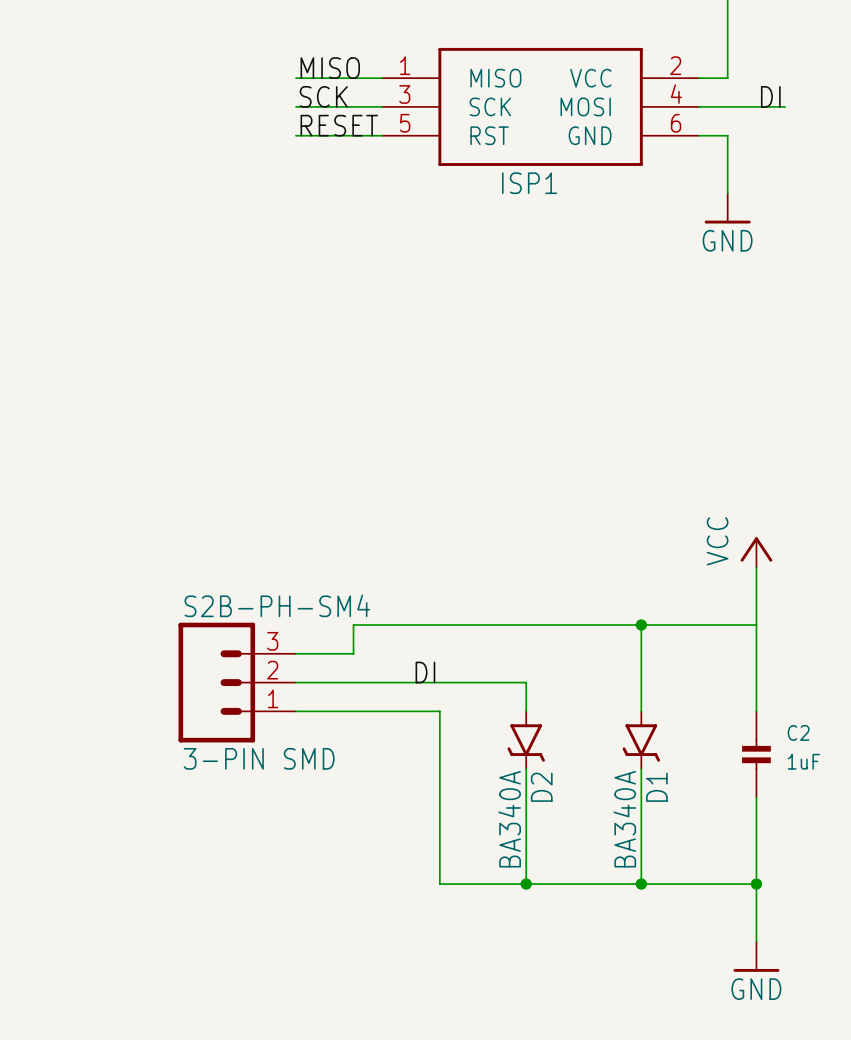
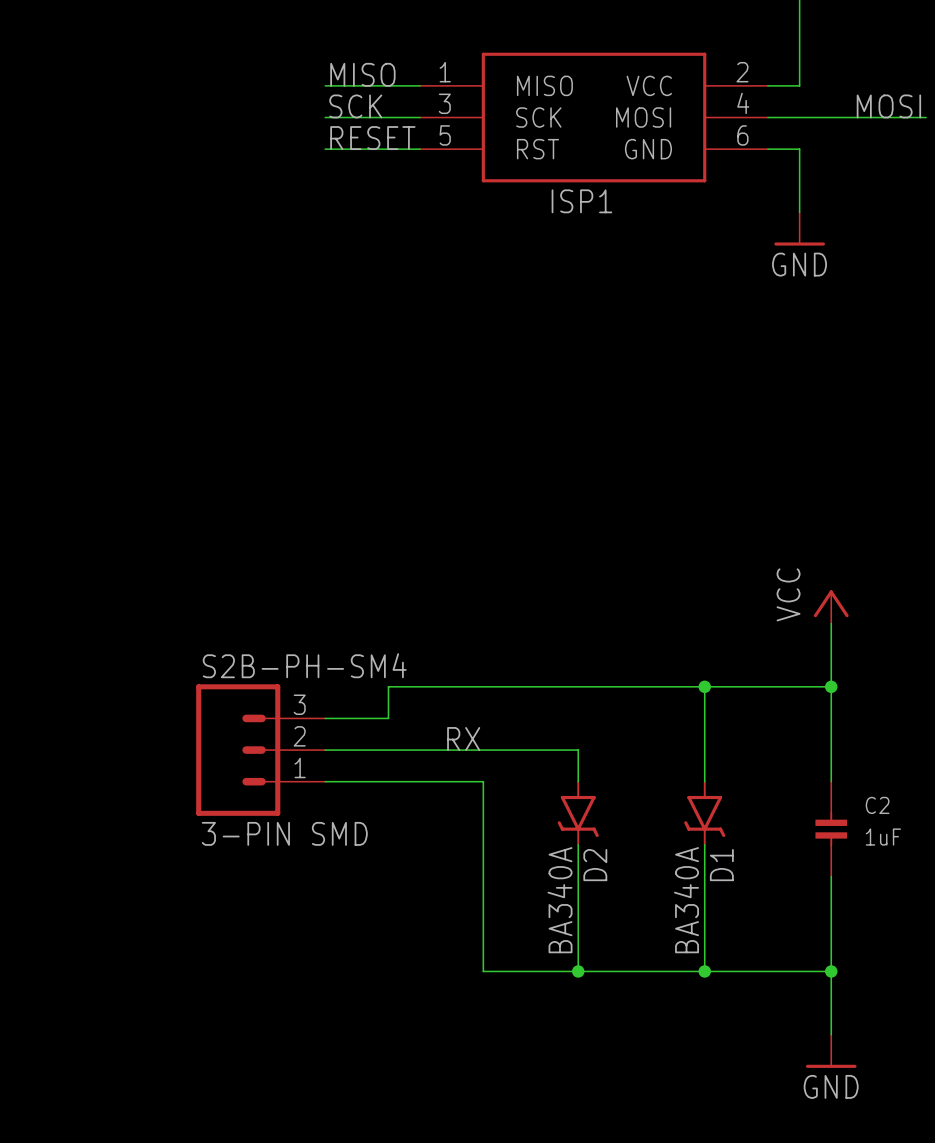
label: DI (770, 96) -> none
label: none -> MOSI (888, 106)
wire: none -> (862, 117) (926, 117)
junction: none -> (831, 686)
label: DI (425, 672) -> RX (463, 739)

